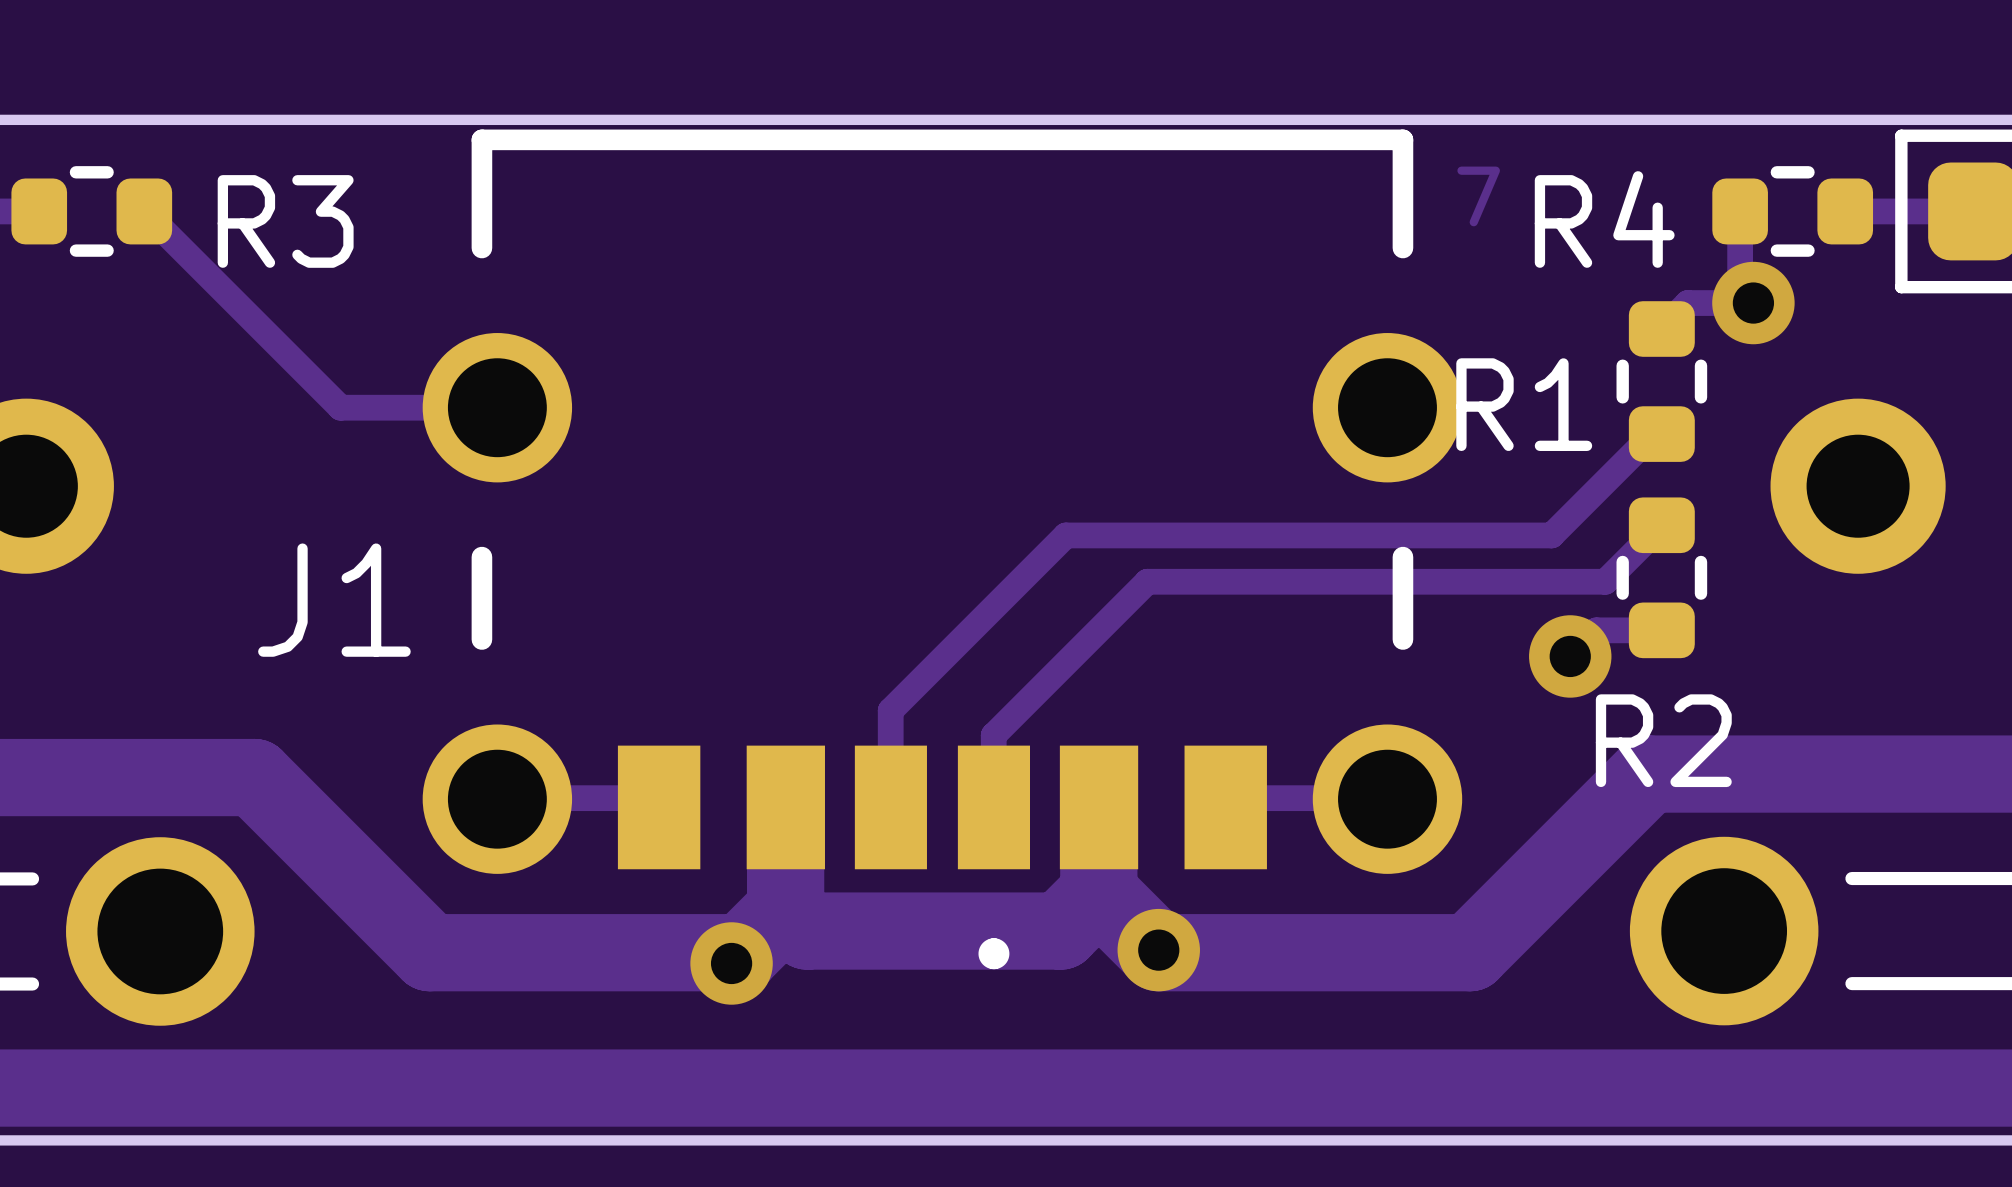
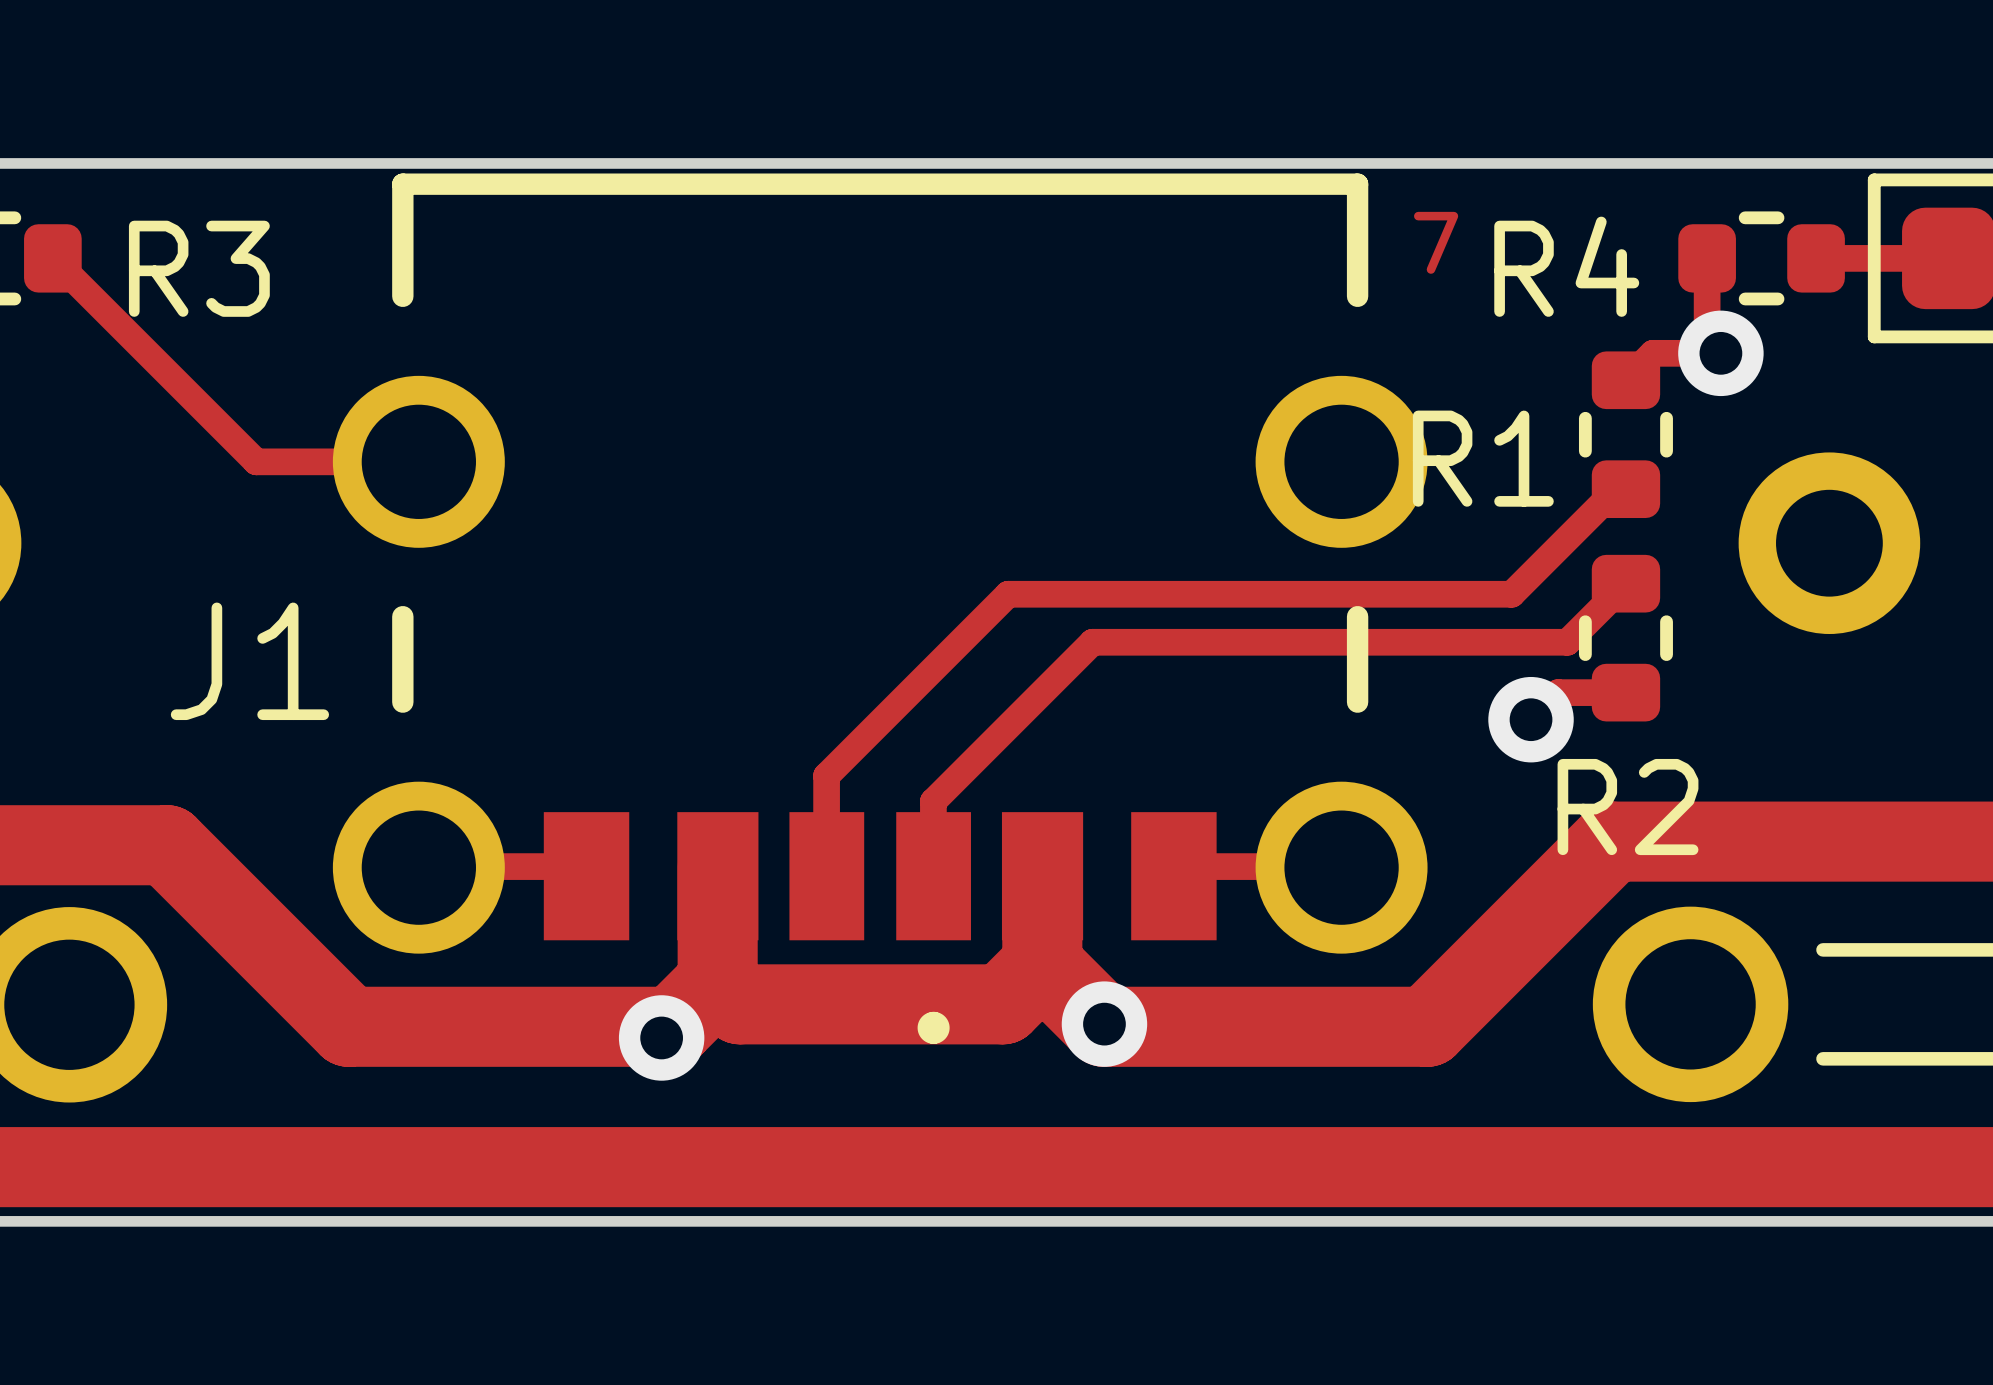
J1 footprint: [422, 129, 1463, 970] -> [332, 173, 1428, 1044]

